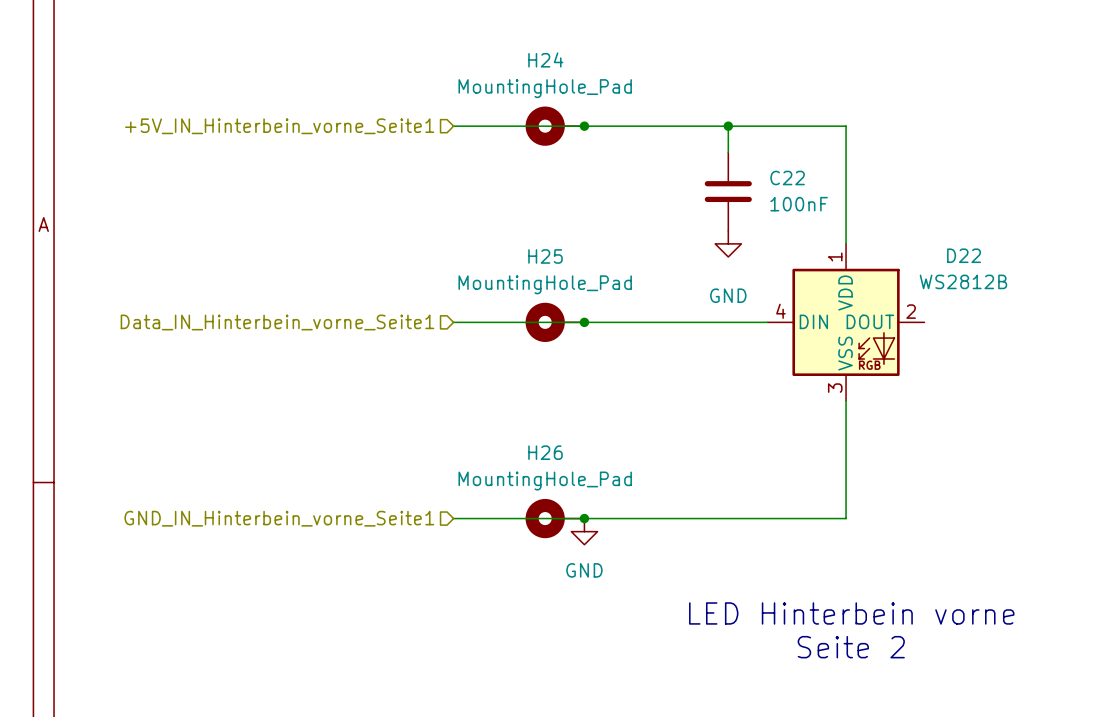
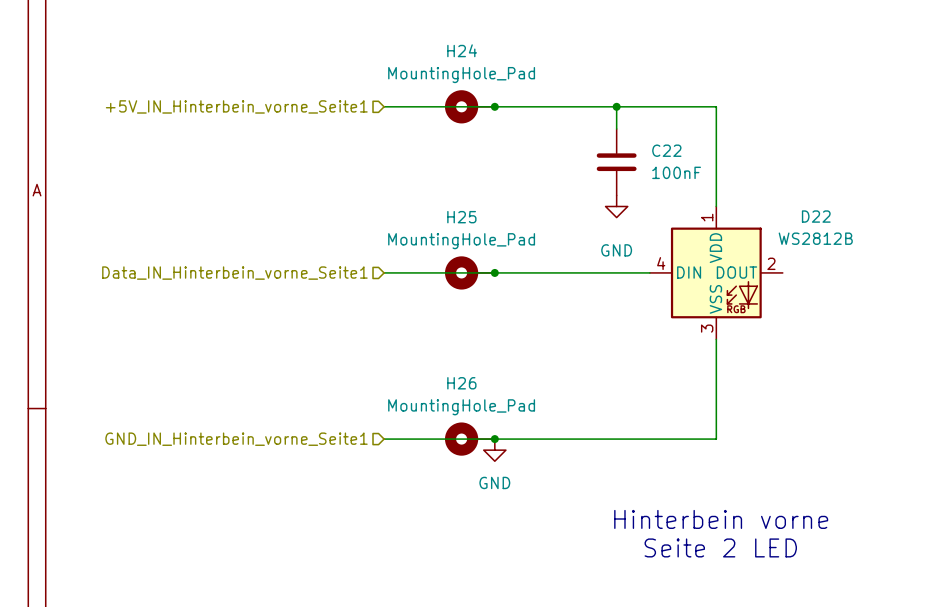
text: LED Hinterbein vorne (851, 613) -> Hinterbein vorne (721, 519)
text: Seite 2 (851, 647) -> Seite 2 LED (720, 547)

